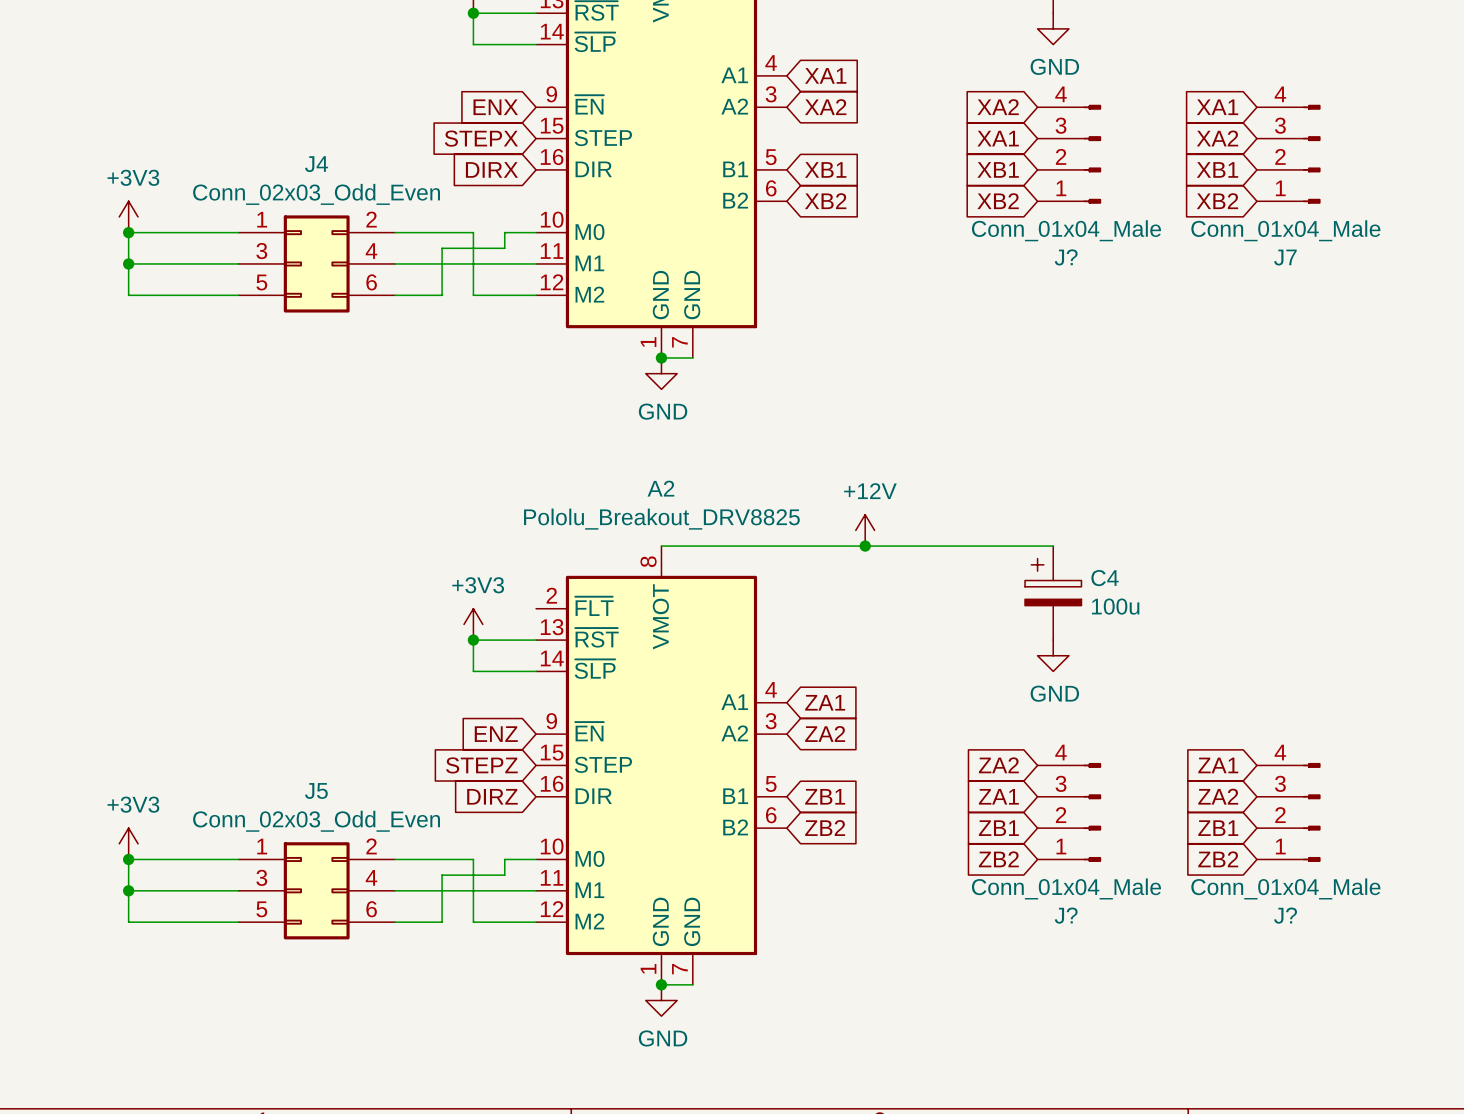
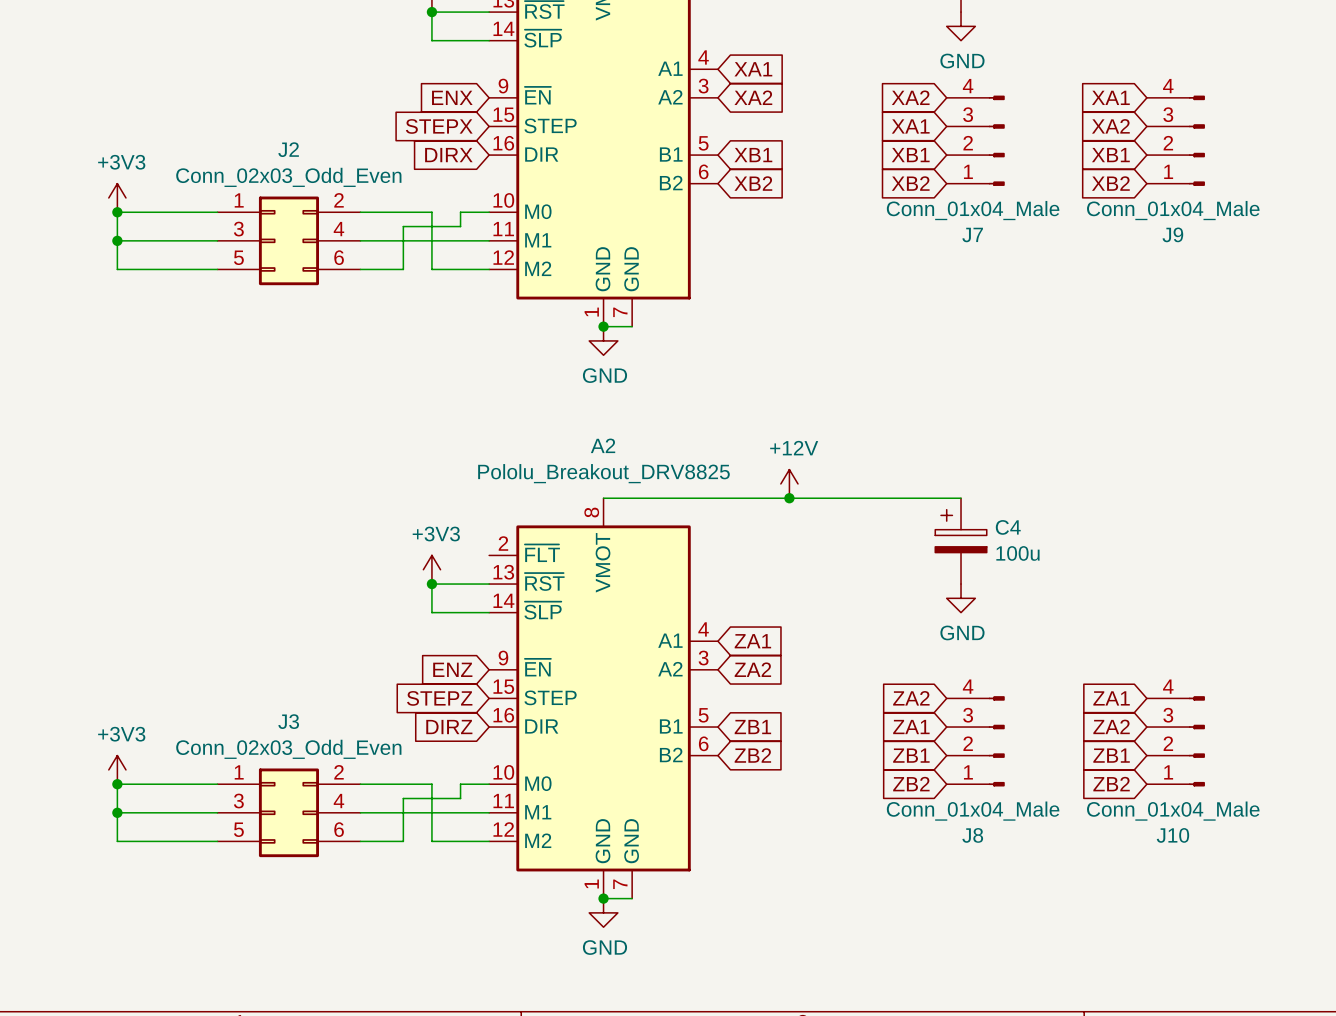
J4 name: J4 (316, 164) -> J2 (288, 149)
J? name: J? (1066, 257) -> J7 (972, 234)
J7 name: J7 (1285, 257) -> J9 (1172, 234)
J5 name: J5 (316, 790) -> J3 (288, 721)
J? name: J? (1066, 915) -> J8 (972, 835)
J? name: J? (1285, 915) -> J10 (1172, 835)

